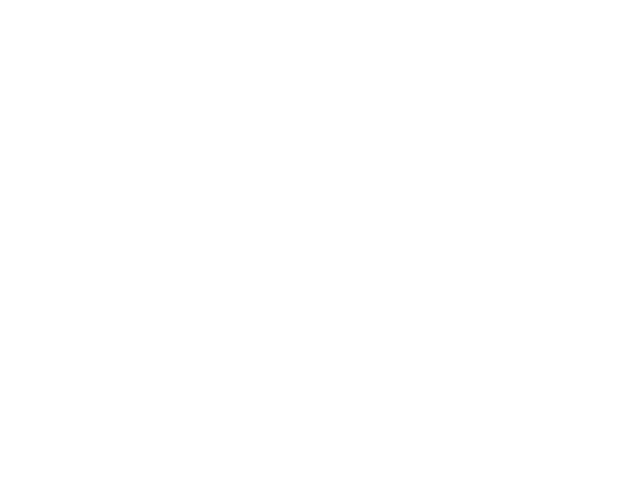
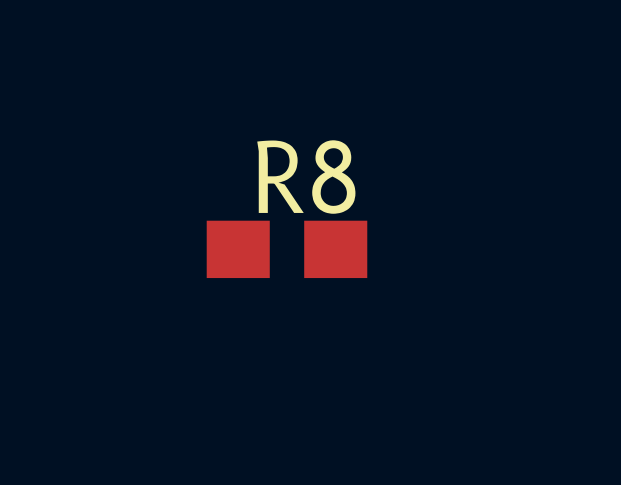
R8: none -> (286, 249)

